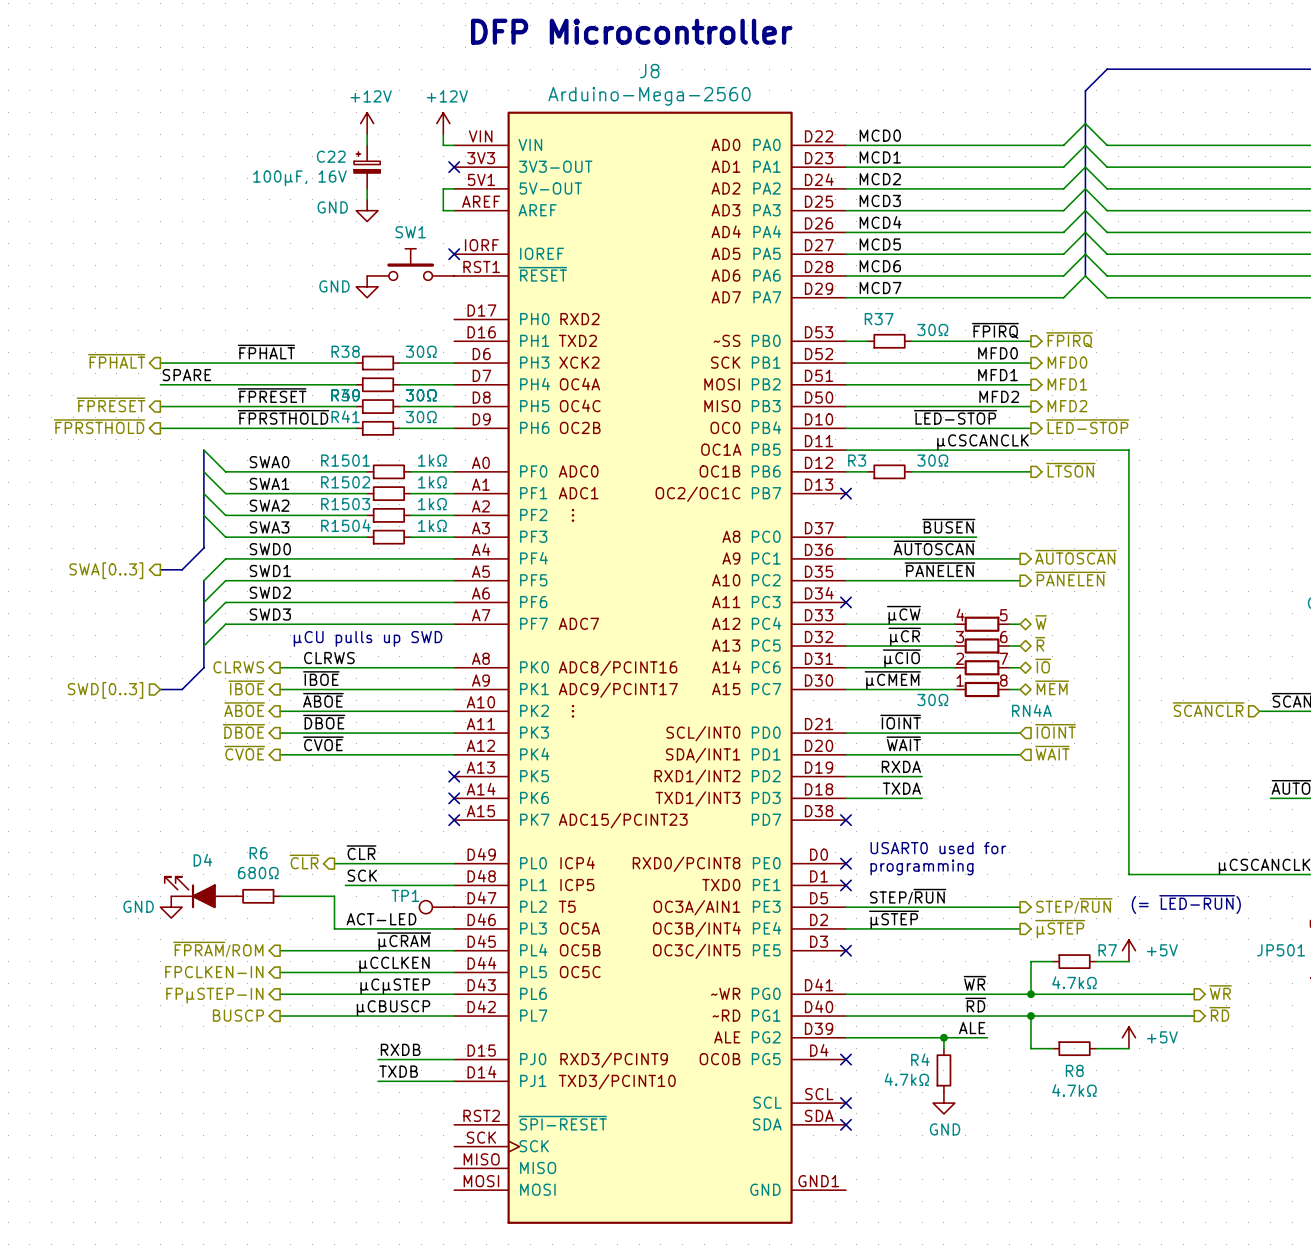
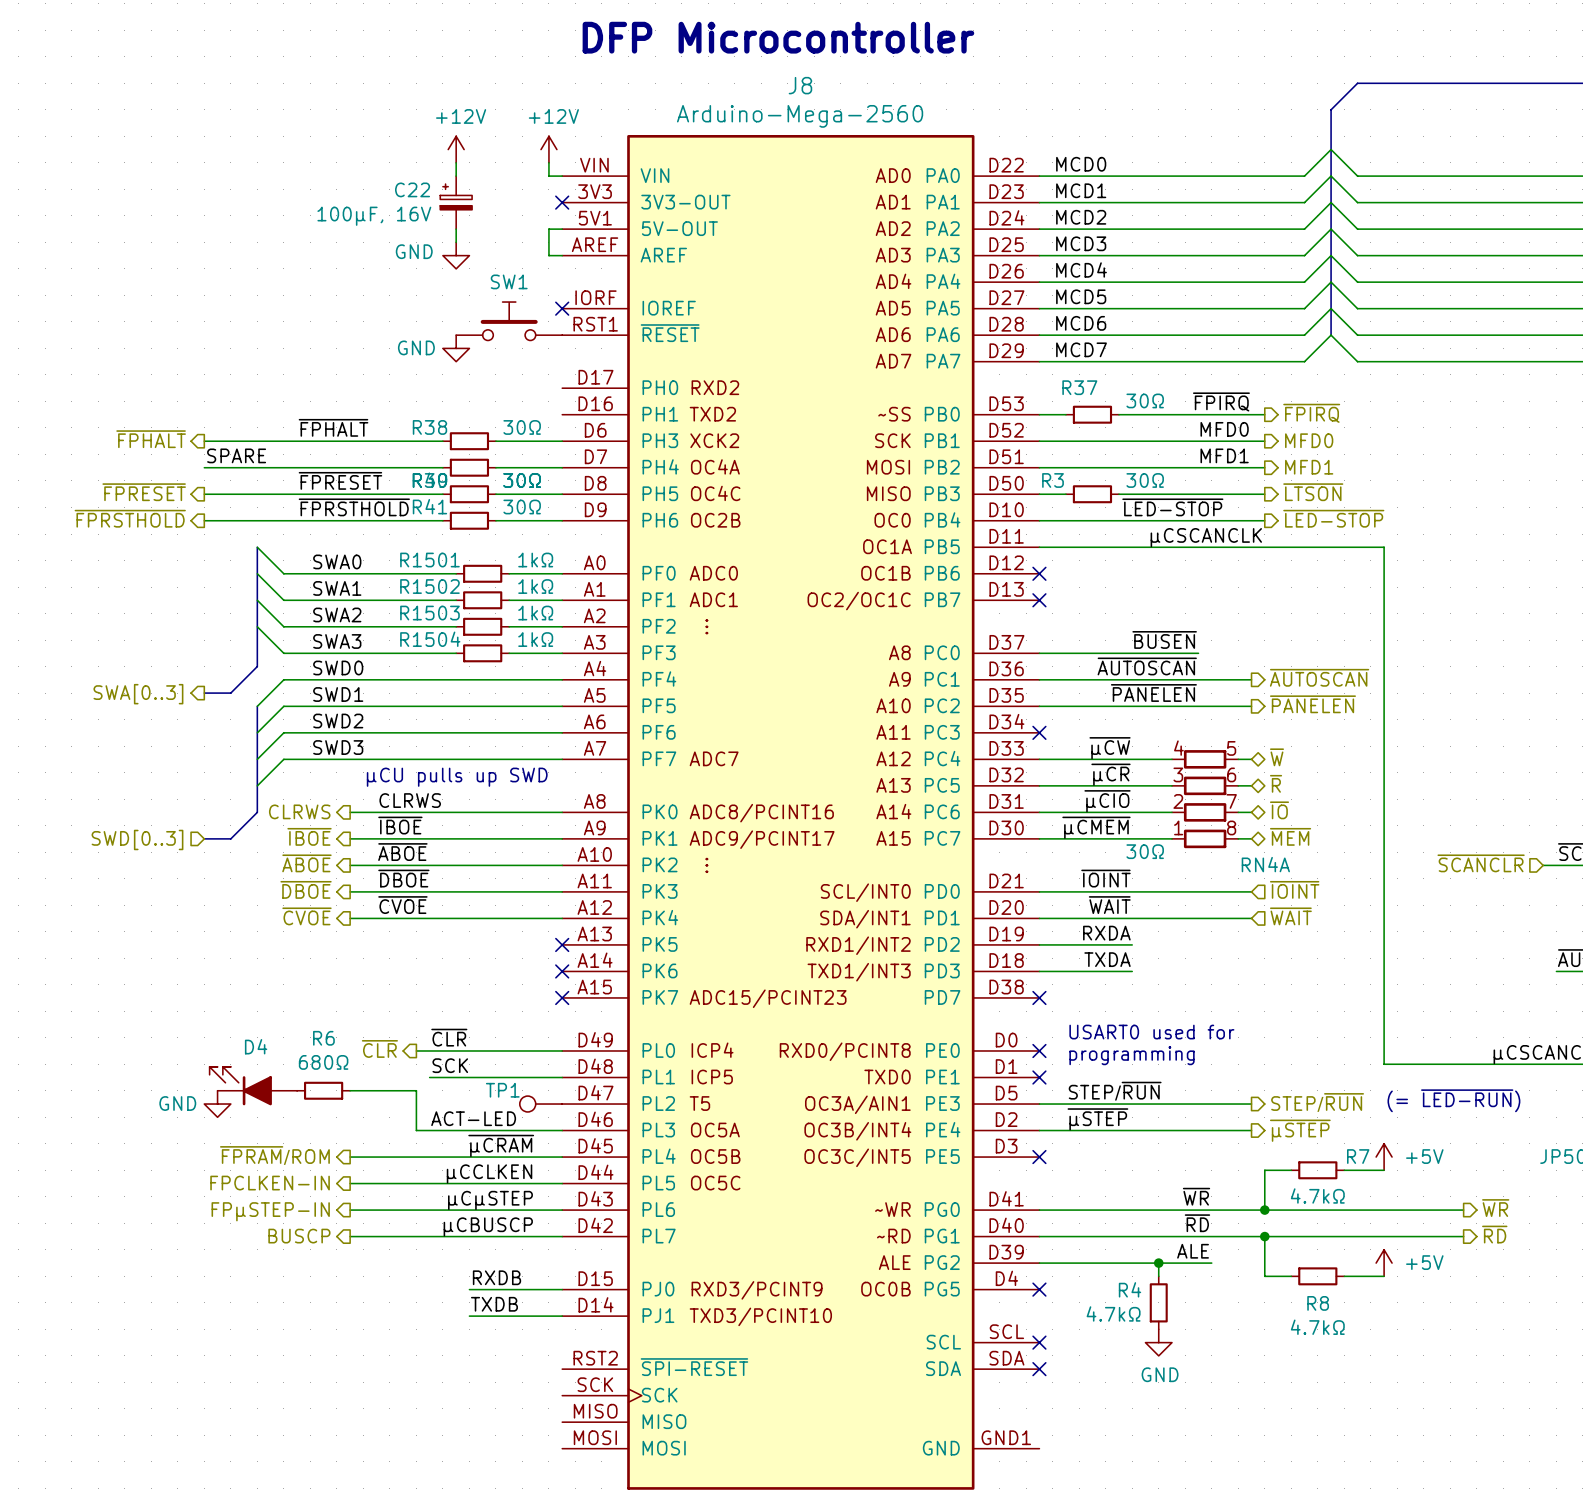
label: MFD2 (999, 396) -> none
wire: (867, 406) (911, 406) -> none
hierarchical label: MFD2 (1067, 406) -> ~{LTSON} (1313, 492)
hierarchical label: ~{LTSON} (1070, 470) -> none
wire: (845, 471) (867, 471) -> none
no-connect mark: none -> (1039, 573)
R3 position: (889, 471) -> (1092, 494)
wire: (911, 471) (1031, 471) -> none

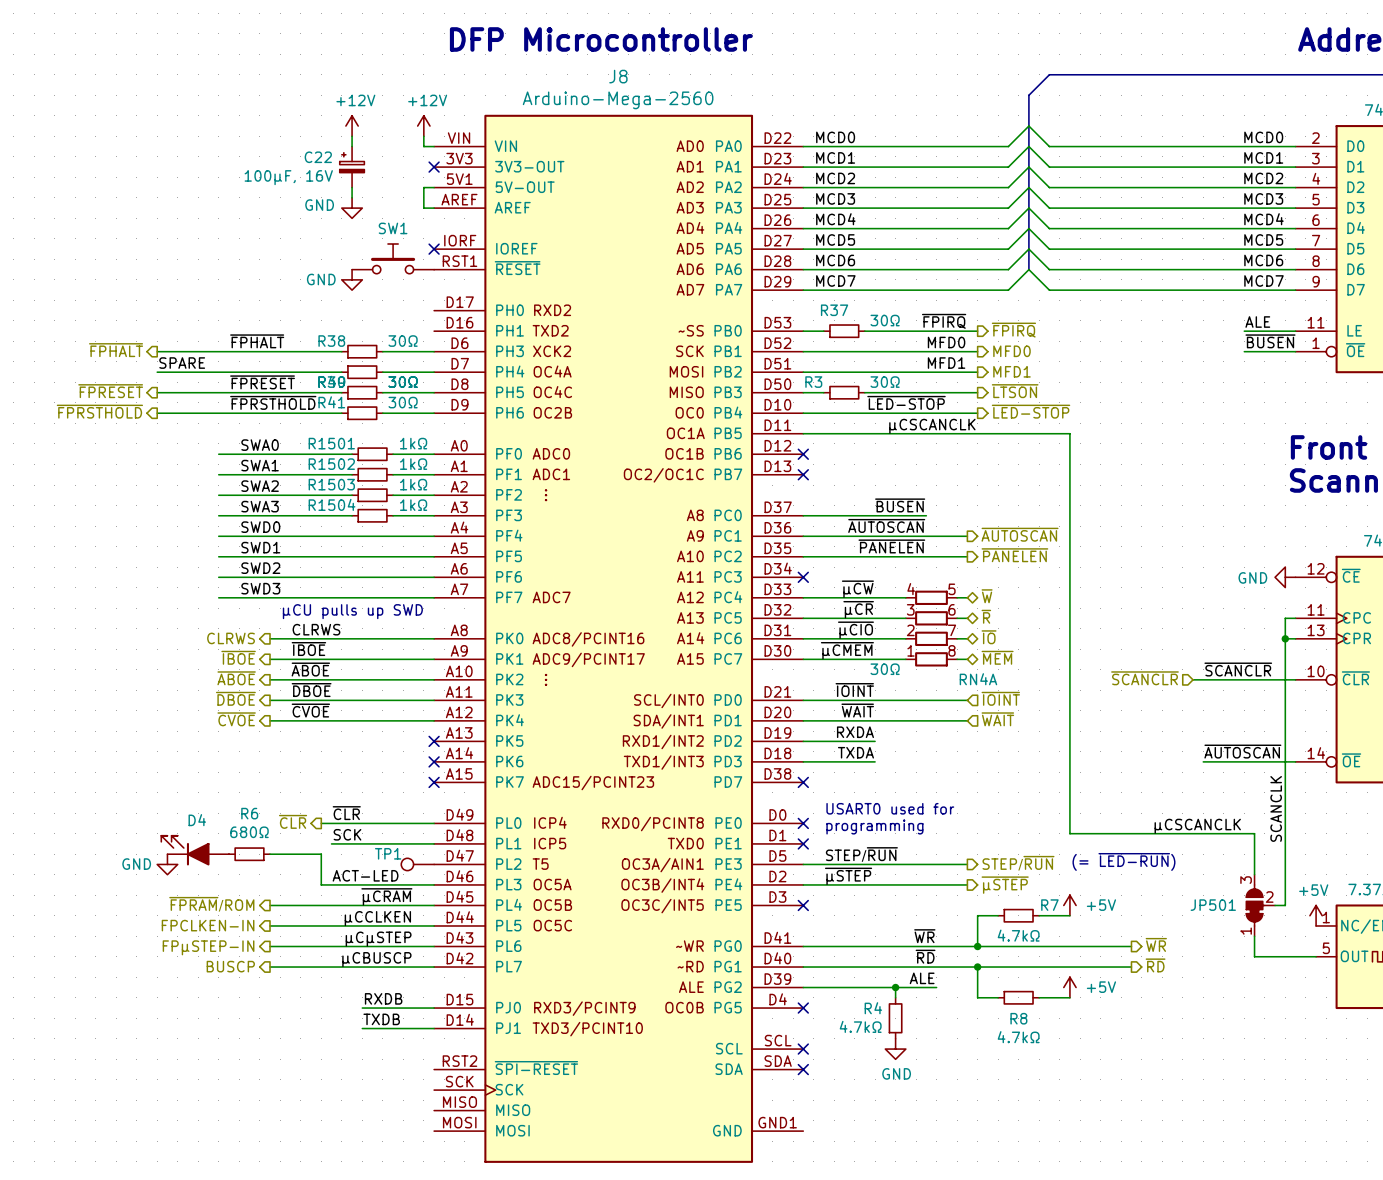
wire: (257, 547) (283, 573) -> none
bus: (257, 547) (257, 666) (230, 693) (204, 693) -> none
wire: (257, 573) (283, 600) -> none
wire: (257, 600) (283, 626) -> none
wire: (257, 626) (283, 653) -> none
wire: (283, 679) (257, 706) -> none
hierarchical label: SWA[0..3] (138, 694) -> none
bus: (257, 706) (257, 812) (230, 838) (204, 838) -> none
wire: (283, 706) (257, 732) -> none
wire: (283, 732) (257, 759) -> none
wire: (283, 759) (257, 785) -> none
hierarchical label: SWD[0..3] (137, 839) -> none

